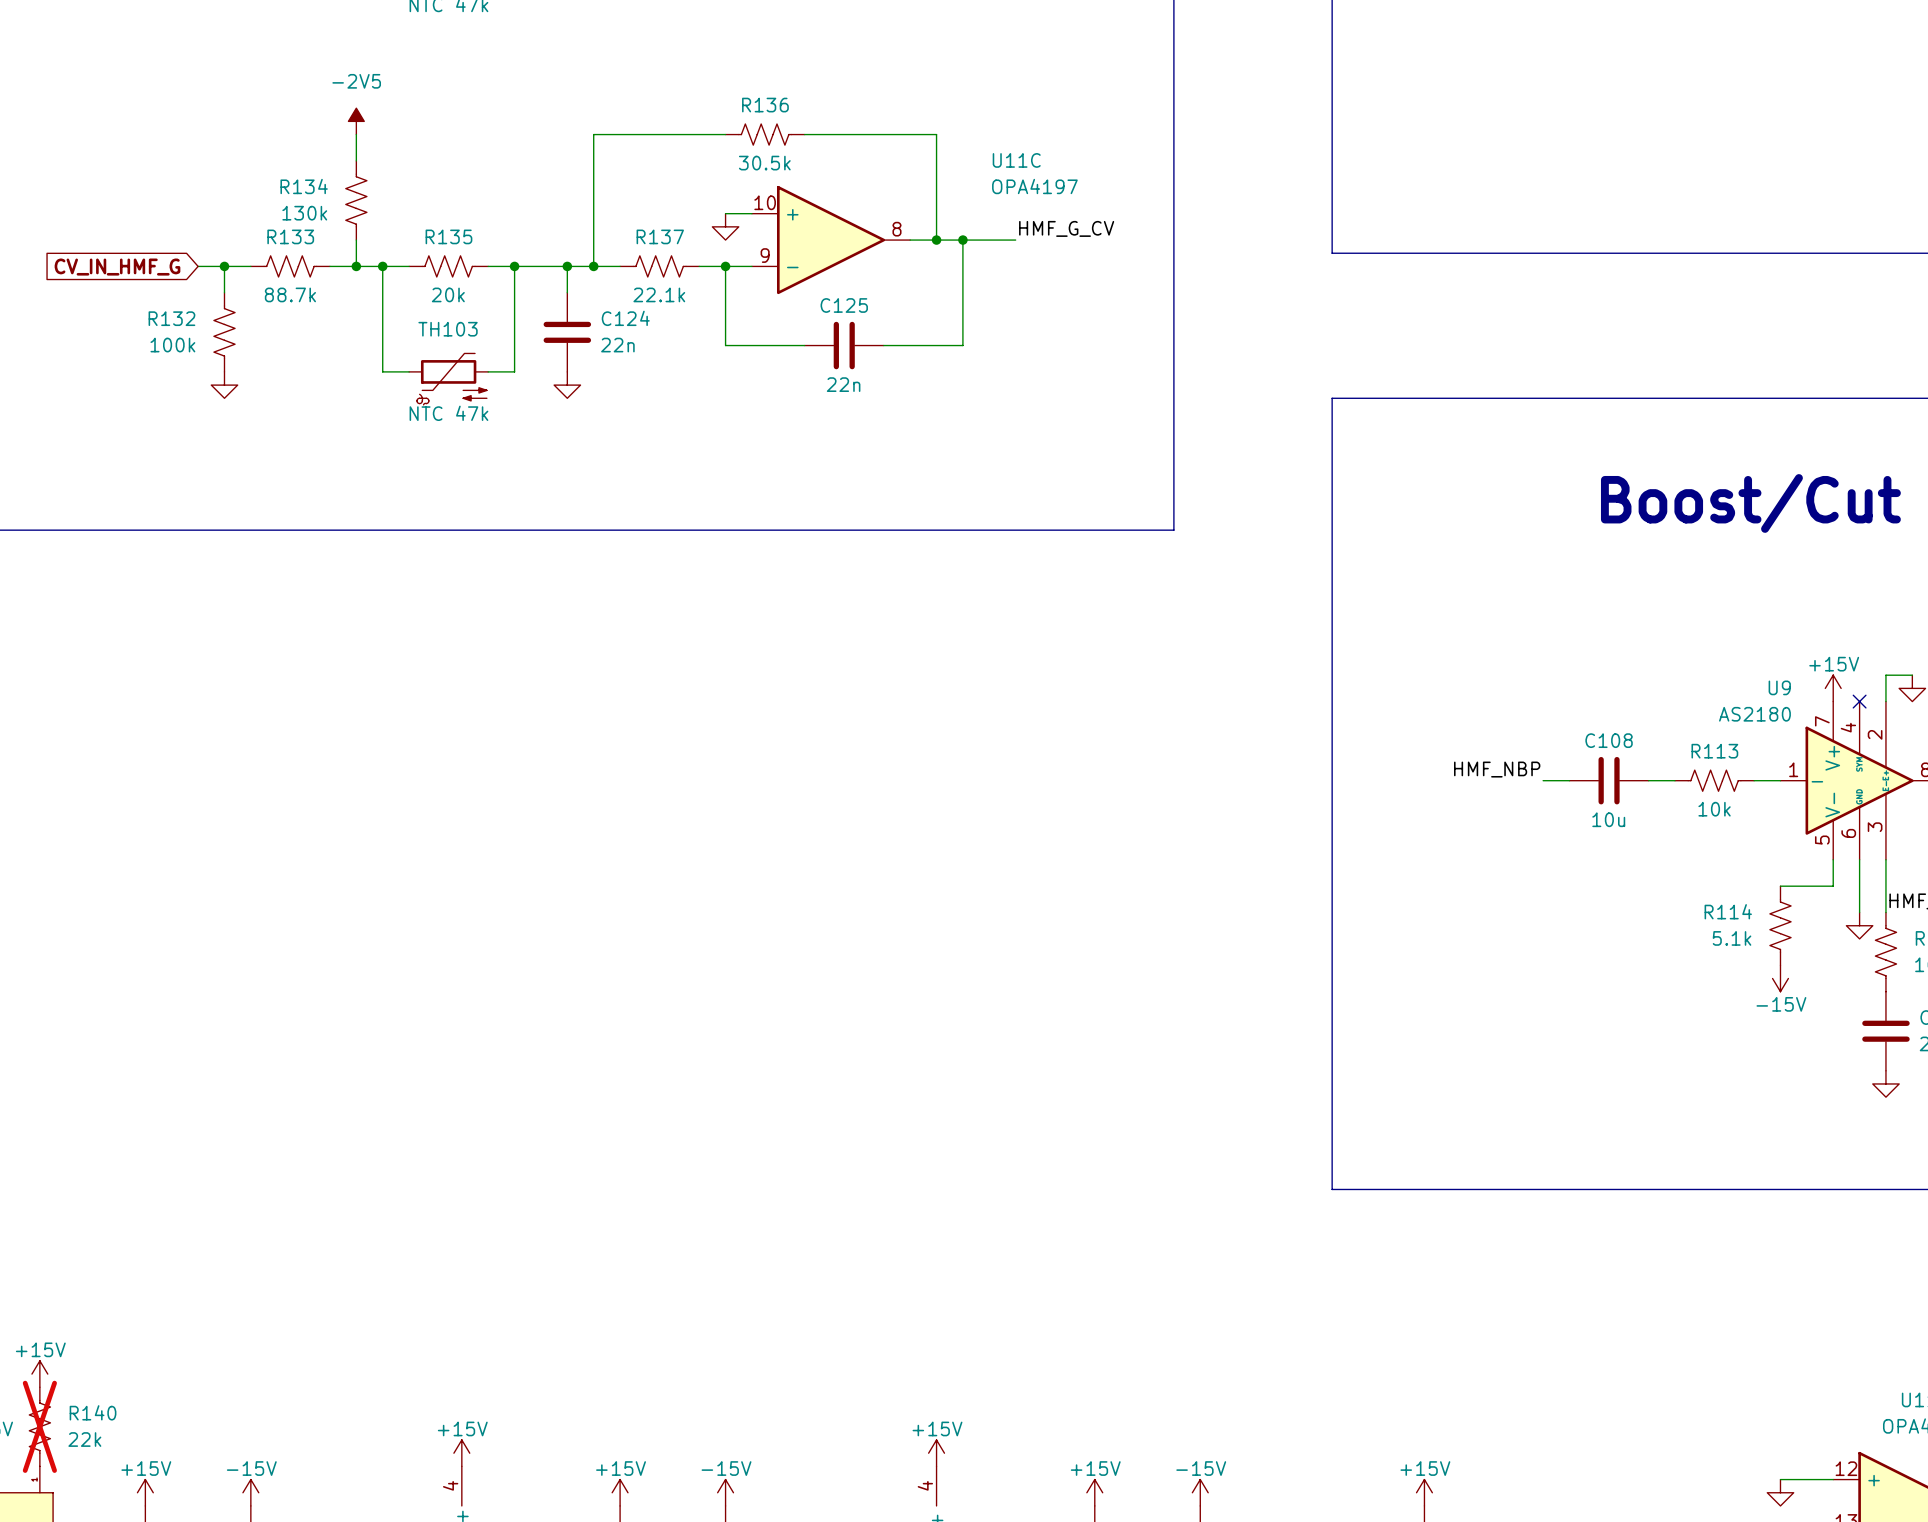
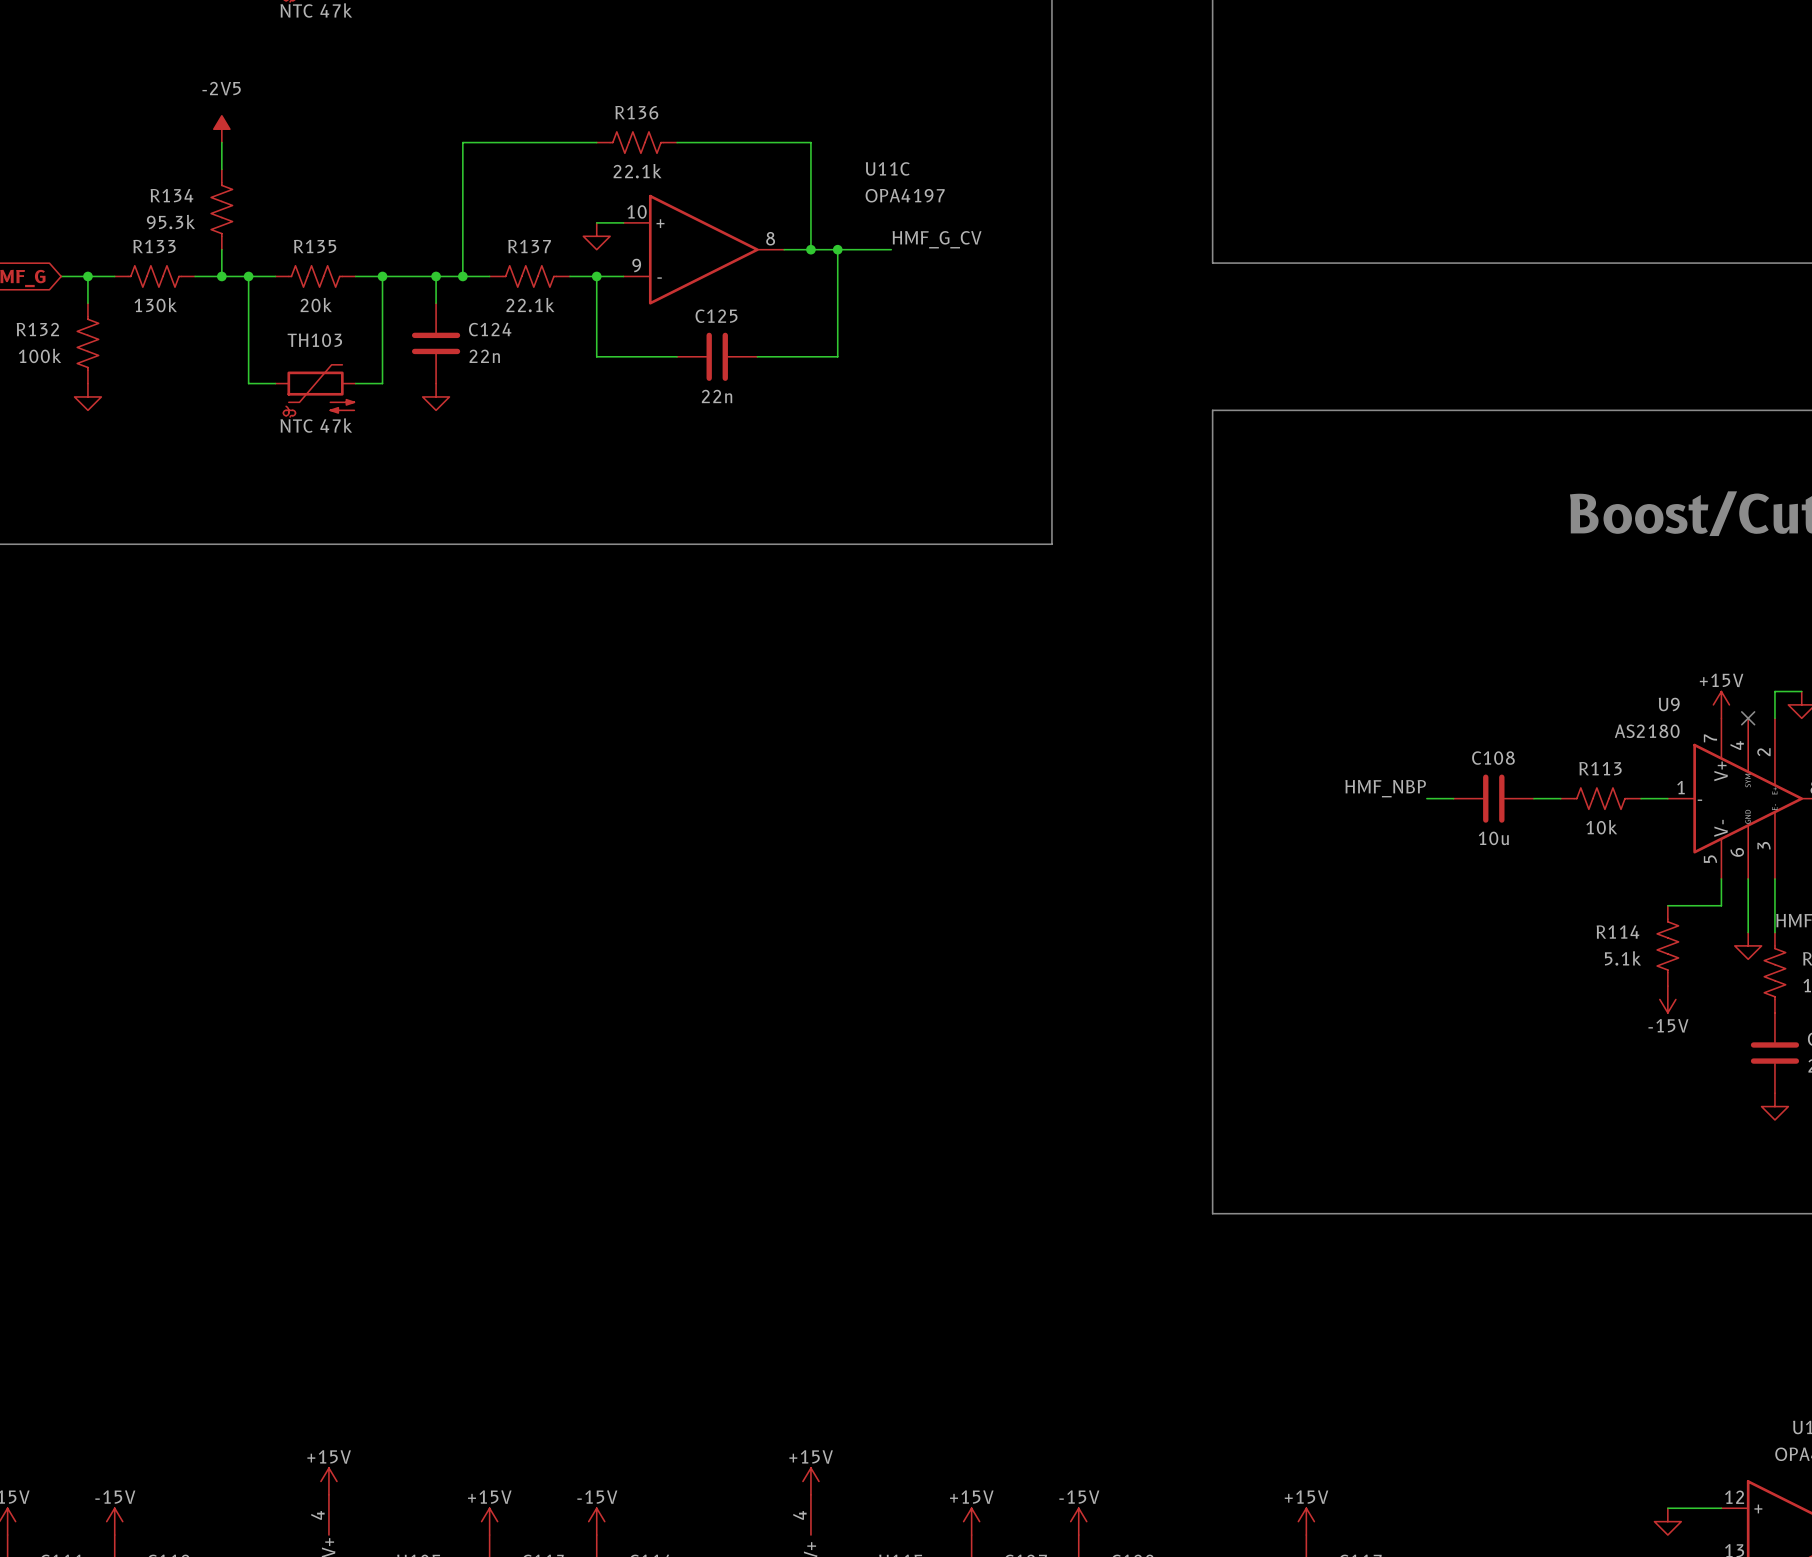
R136 value: 30.5k (764, 163) -> 22.1k (637, 171)
R134 value: 130k (304, 213) -> 95.3k (170, 222)
R133 value: 88.7k (290, 294) -> 130k (155, 305)

